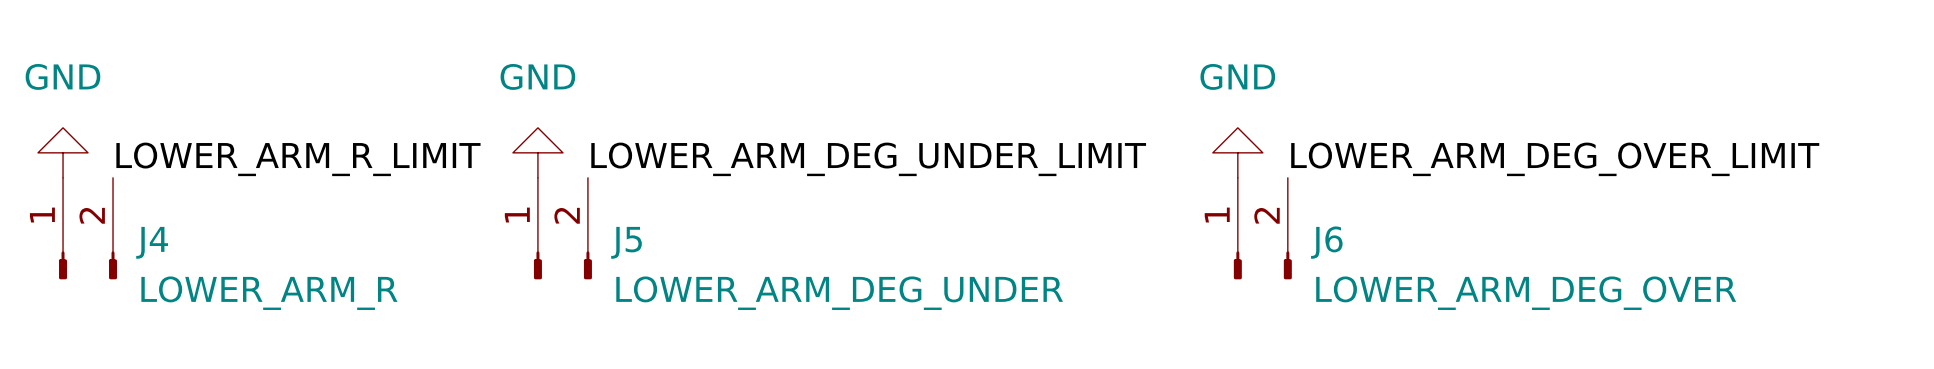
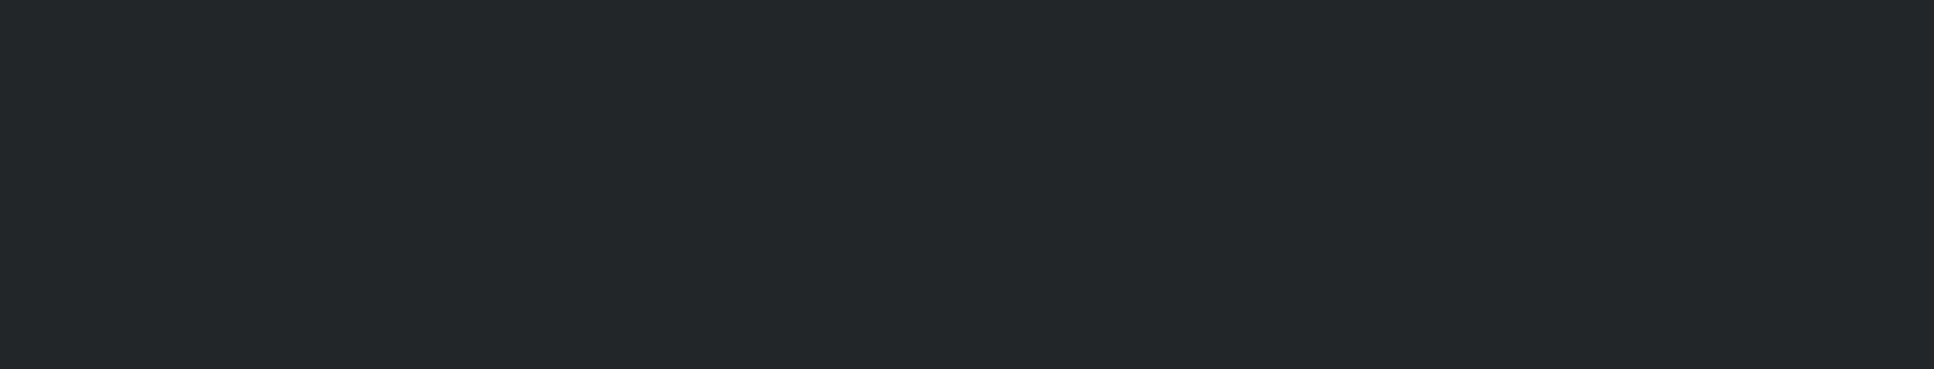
power symbol: GND (63, 152) -> none
power symbol: GND (537, 152) -> none
power symbol: GND (1237, 152) -> none
label: LOWER_ARM_R_LIMIT (298, 159) -> none
label: LOWER_ARM_DEG_UNDER_LIMIT (868, 159) -> none
label: LOWER_ARM_DEG_OVER_LIMIT (1555, 159) -> none
J4: LOWER_ARM_R (88, 228) -> none
J5: LOWER_ARM_DEG_UNDER (562, 228) -> none
J6: LOWER_ARM_DEG_OVER (1262, 228) -> none

